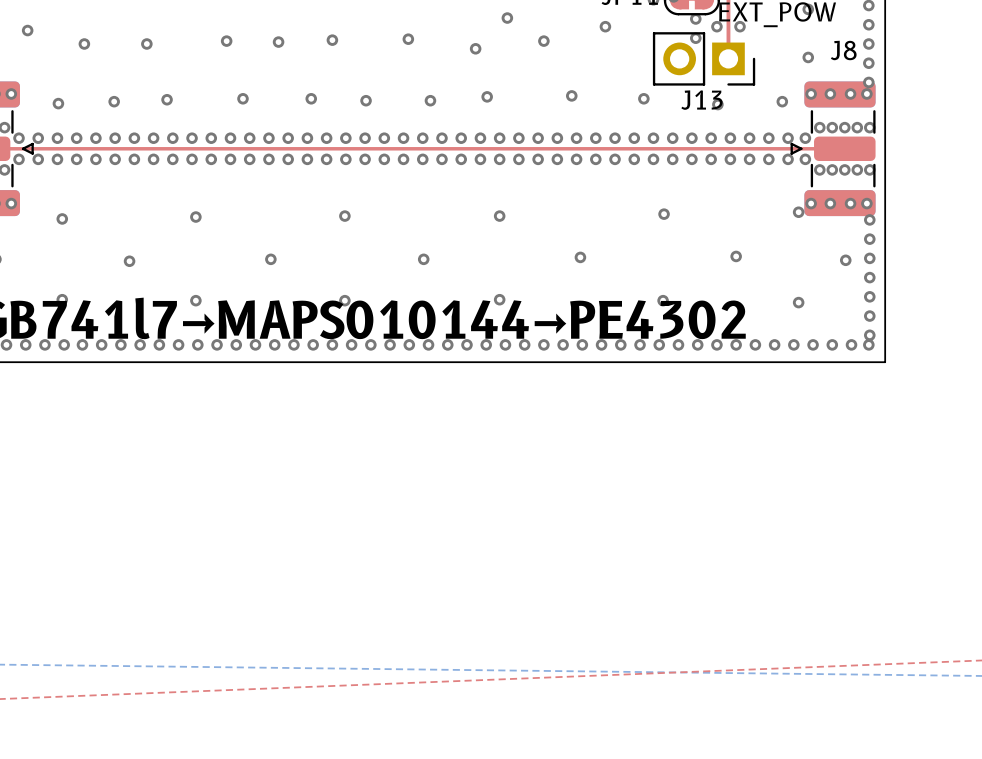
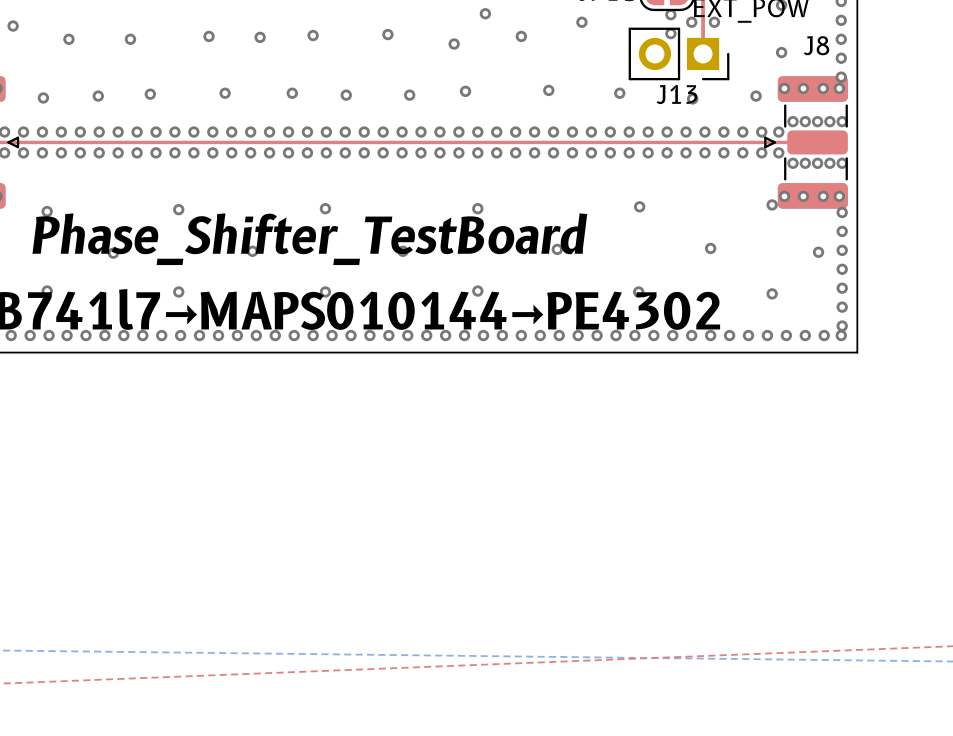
text: none -> Phase_Shifter_TestBoard (309, 239)

